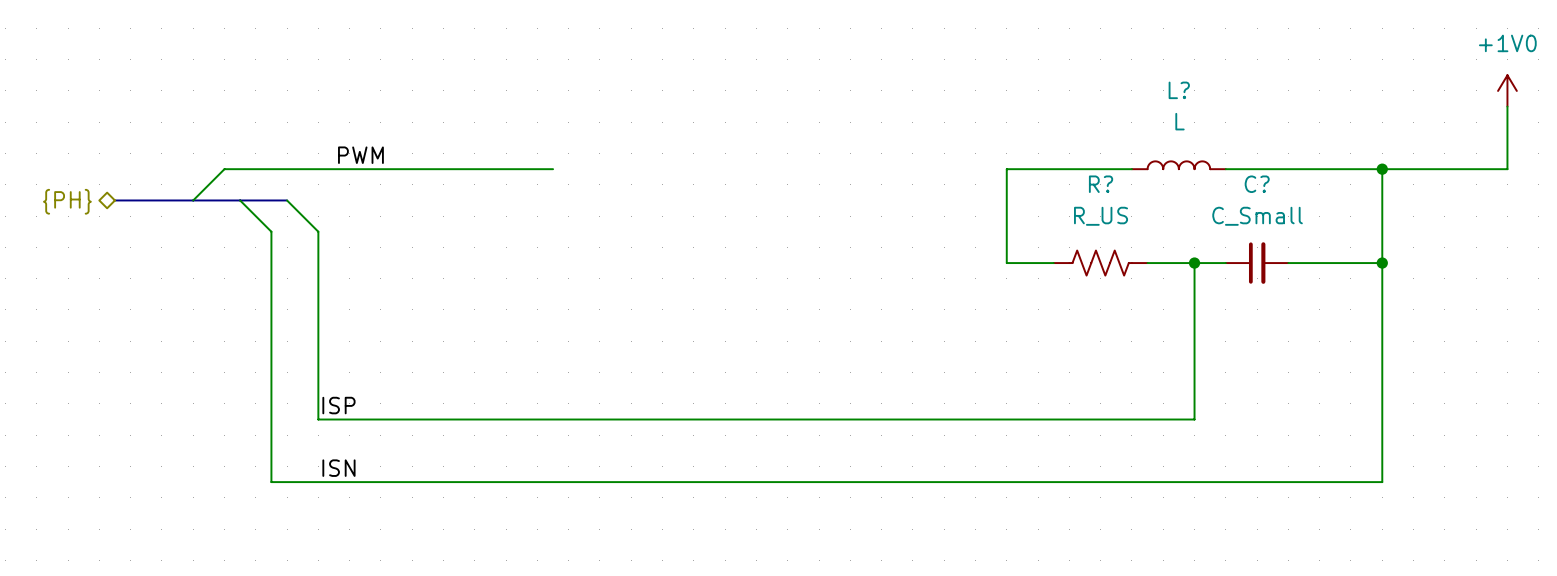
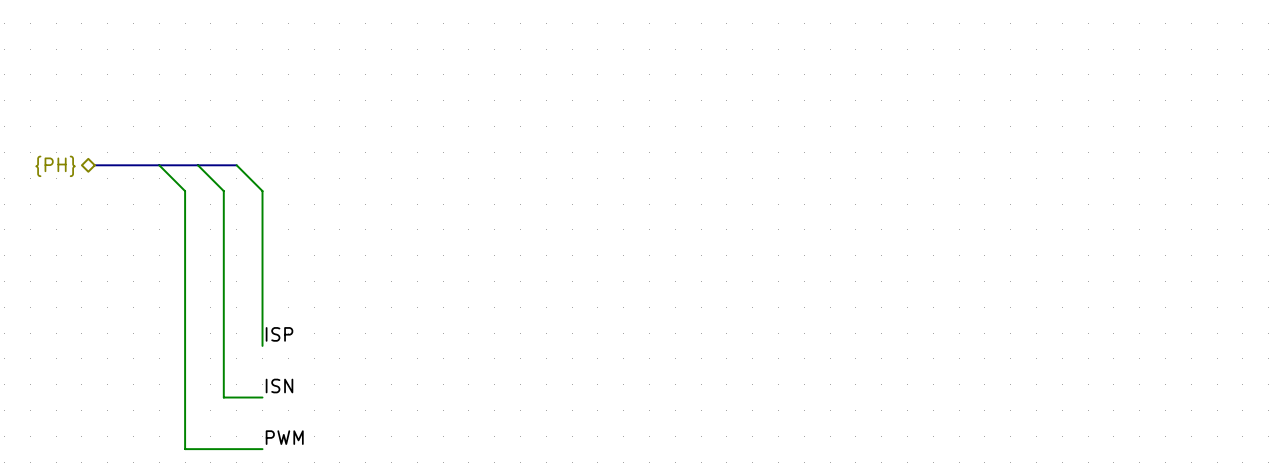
power symbol: +1V0 (1507, 90) -> none
wire: (1507, 106) (1507, 169) (1225, 169) -> none
label: PWM (360, 155) -> none
L?: L (1178, 165) -> none
wire: (553, 169) (224, 169) (193, 200) -> (262, 449) (185, 449) (185, 191) (159, 165)
wire: (1131, 169) (1006, 169) (1006, 263) (1053, 263) -> none
wire: (1382, 169) (1382, 482) (318, 482) -> none
junction: (1382, 169) -> none
R?: R_US (1100, 263) -> none
wire: (1147, 263) (1225, 263) -> none
wire: (1194, 263) (1194, 419) (318, 419) -> none
junction: (1194, 263) -> none
C?: C_Small (1257, 263) -> none
wire: (1288, 263) (1382, 263) -> none
junction: (1382, 263) -> none
label: none -> PWM (284, 437)

